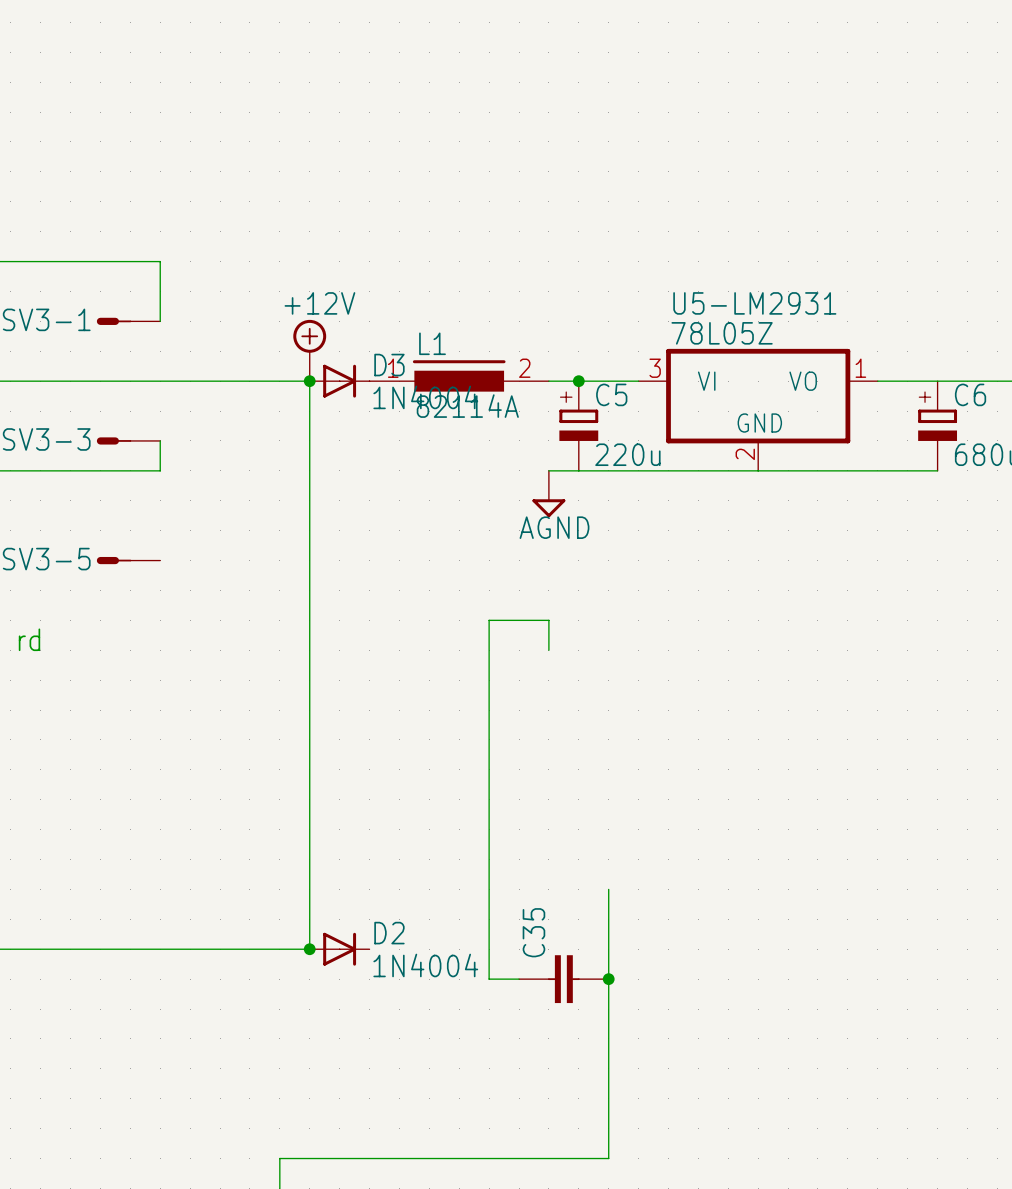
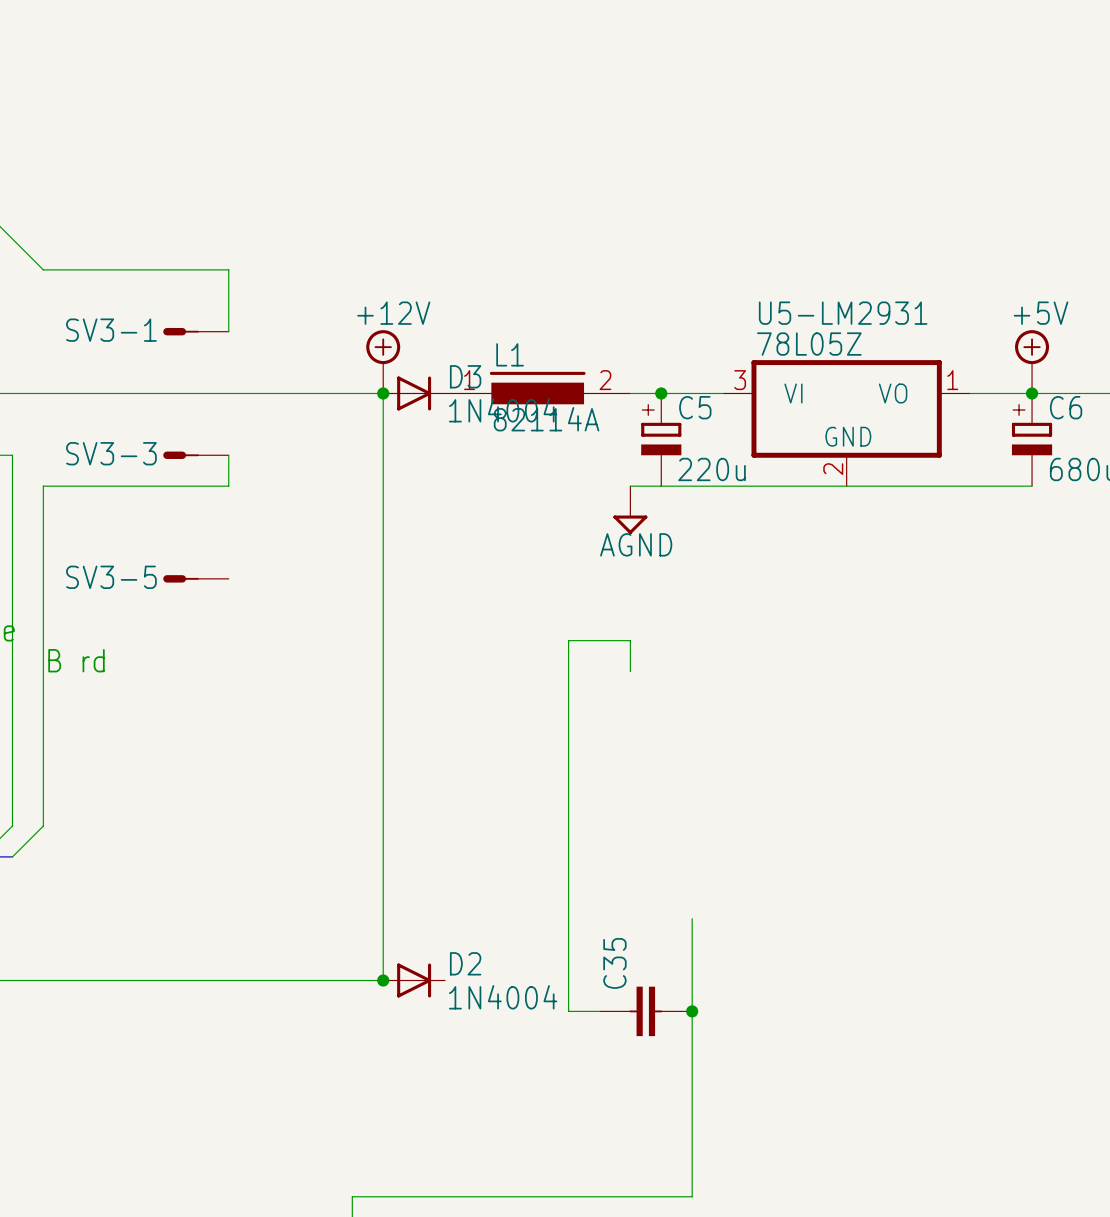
power symbol: none -> +5V (1032, 361)
junction: none -> (1032, 393)

